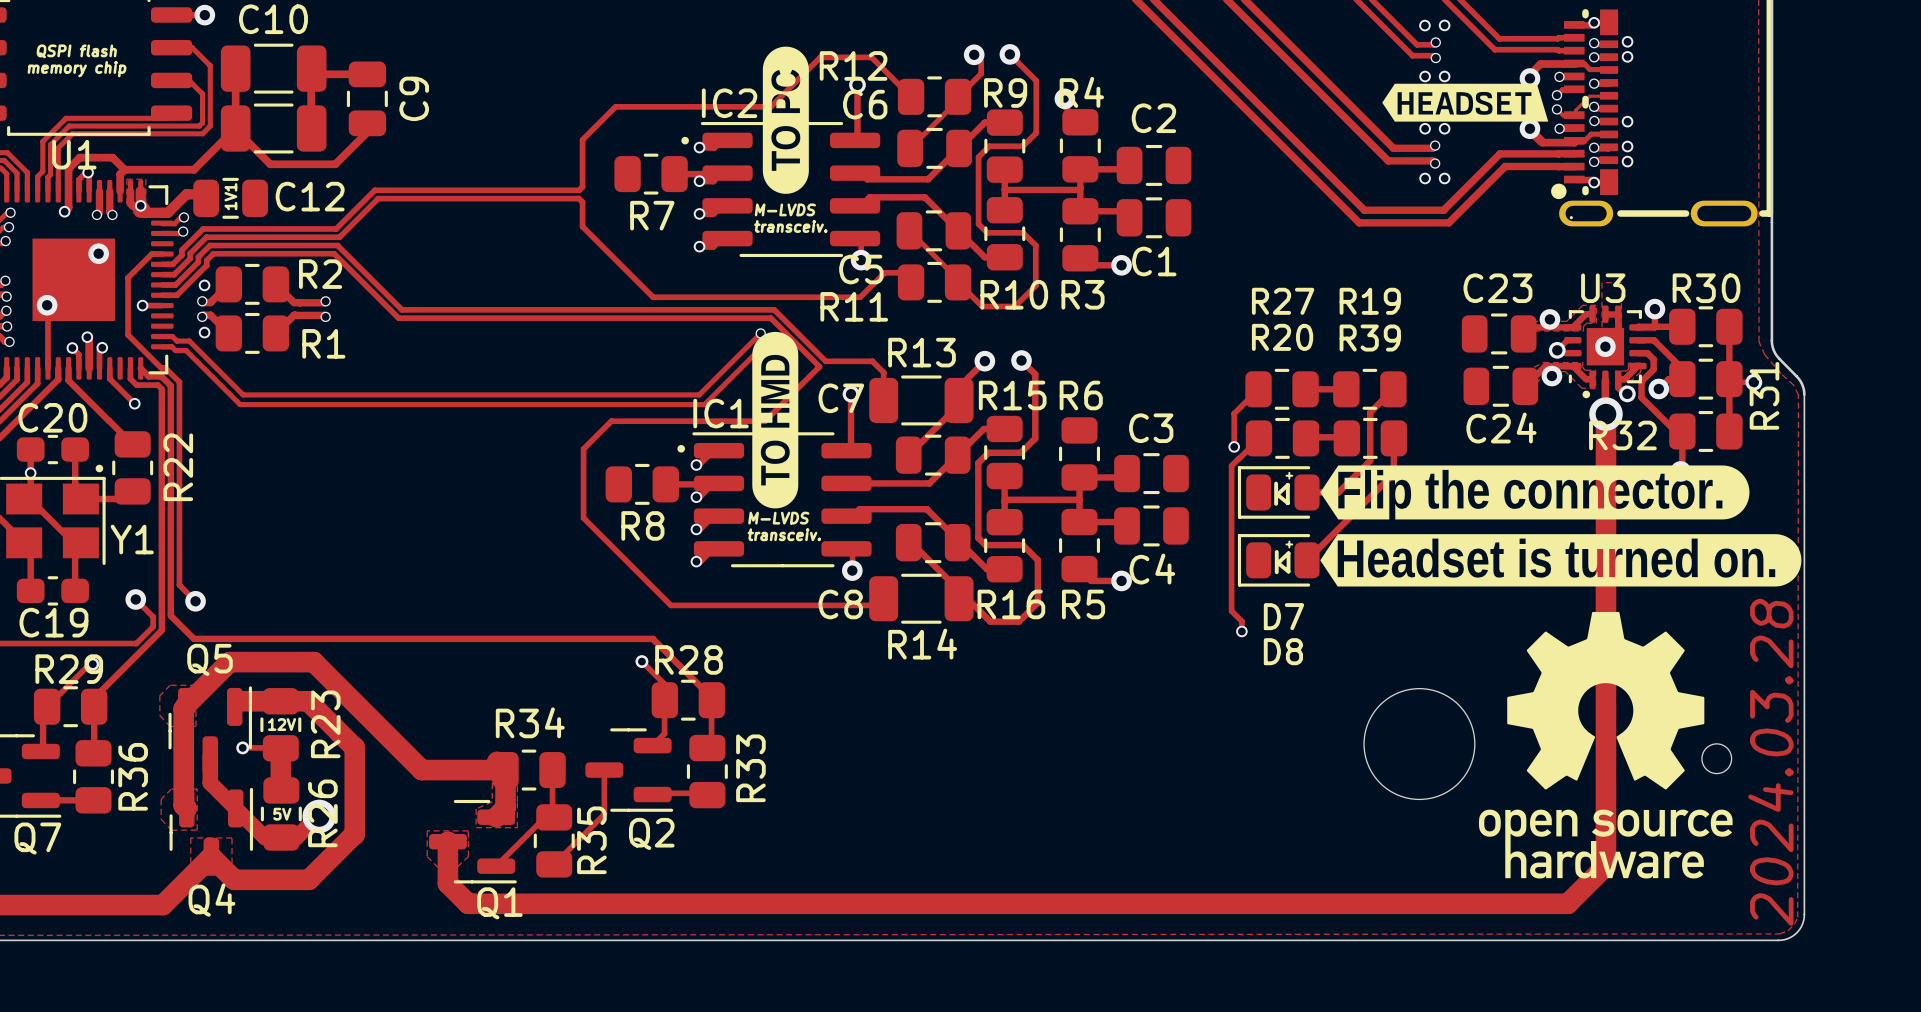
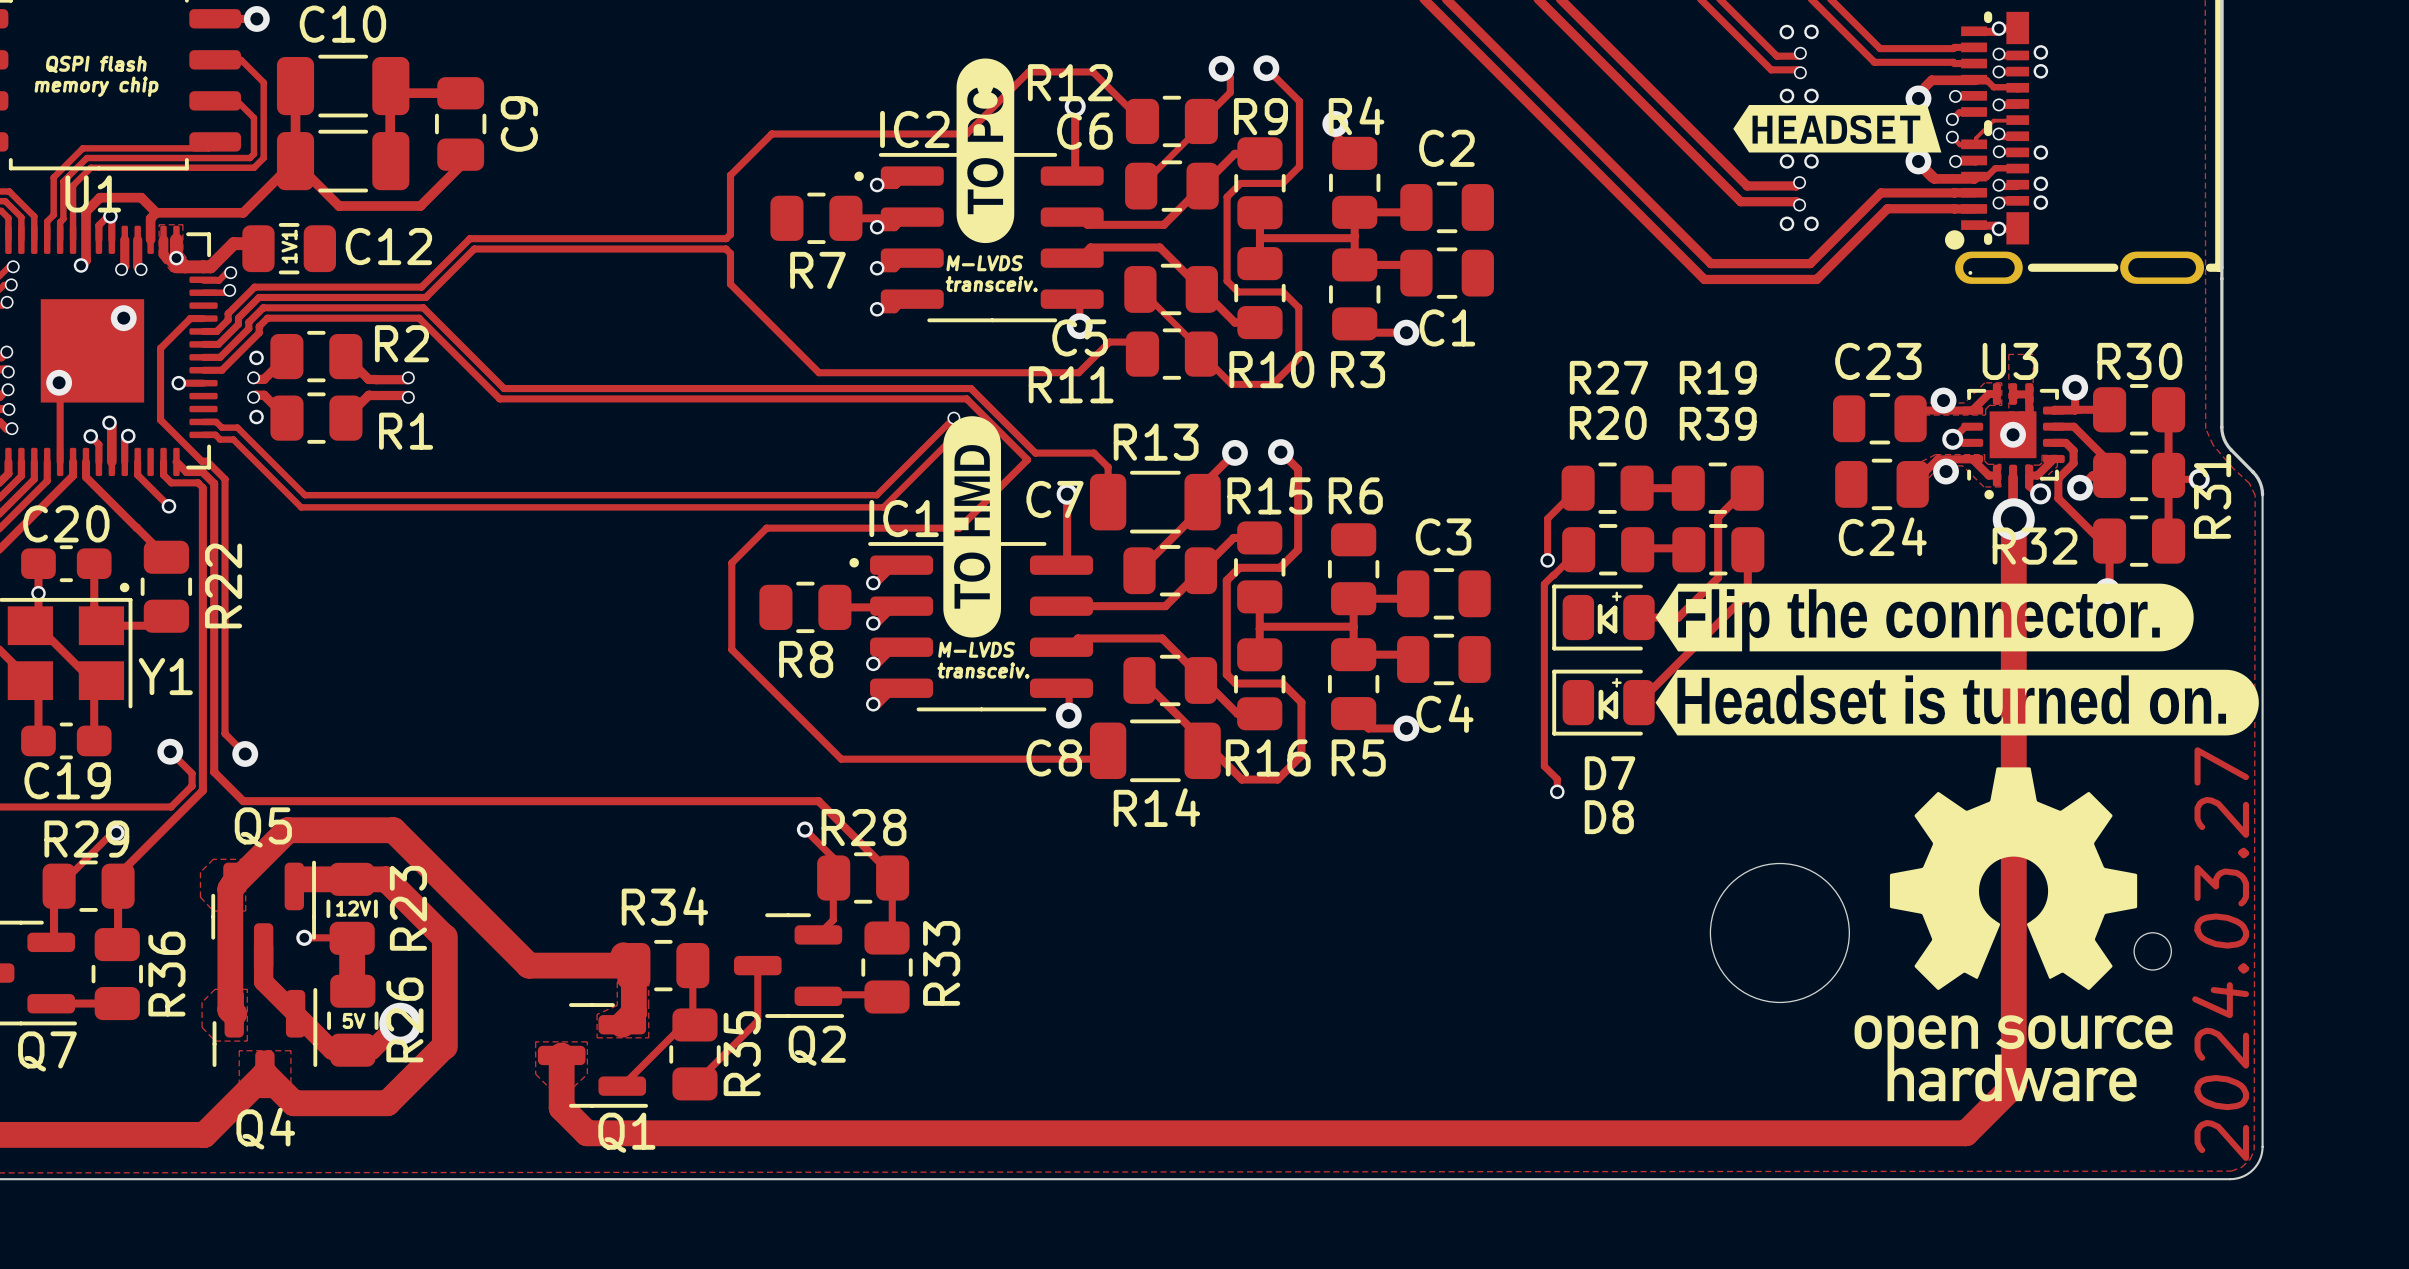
text: 2024.03.28 (1770, 762) -> 2024.03.27 (2220, 954)

